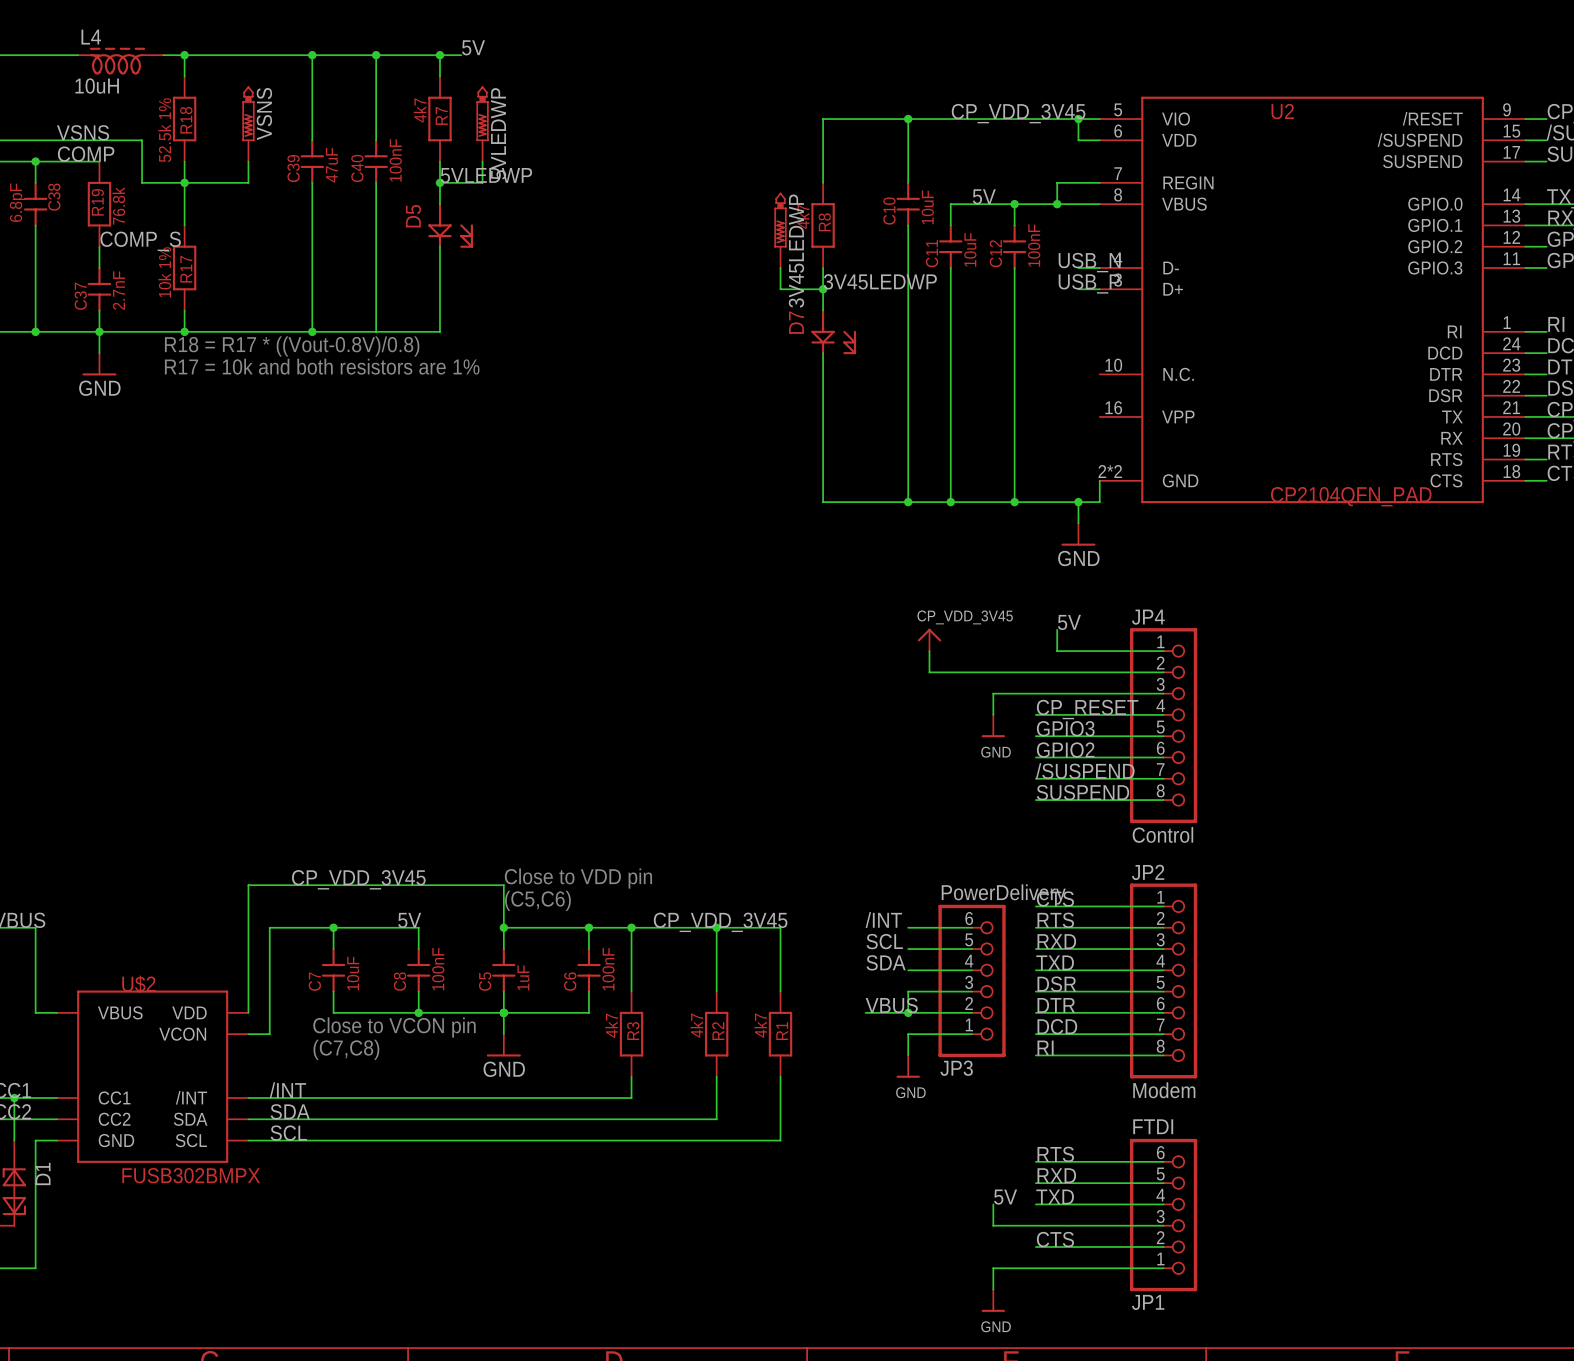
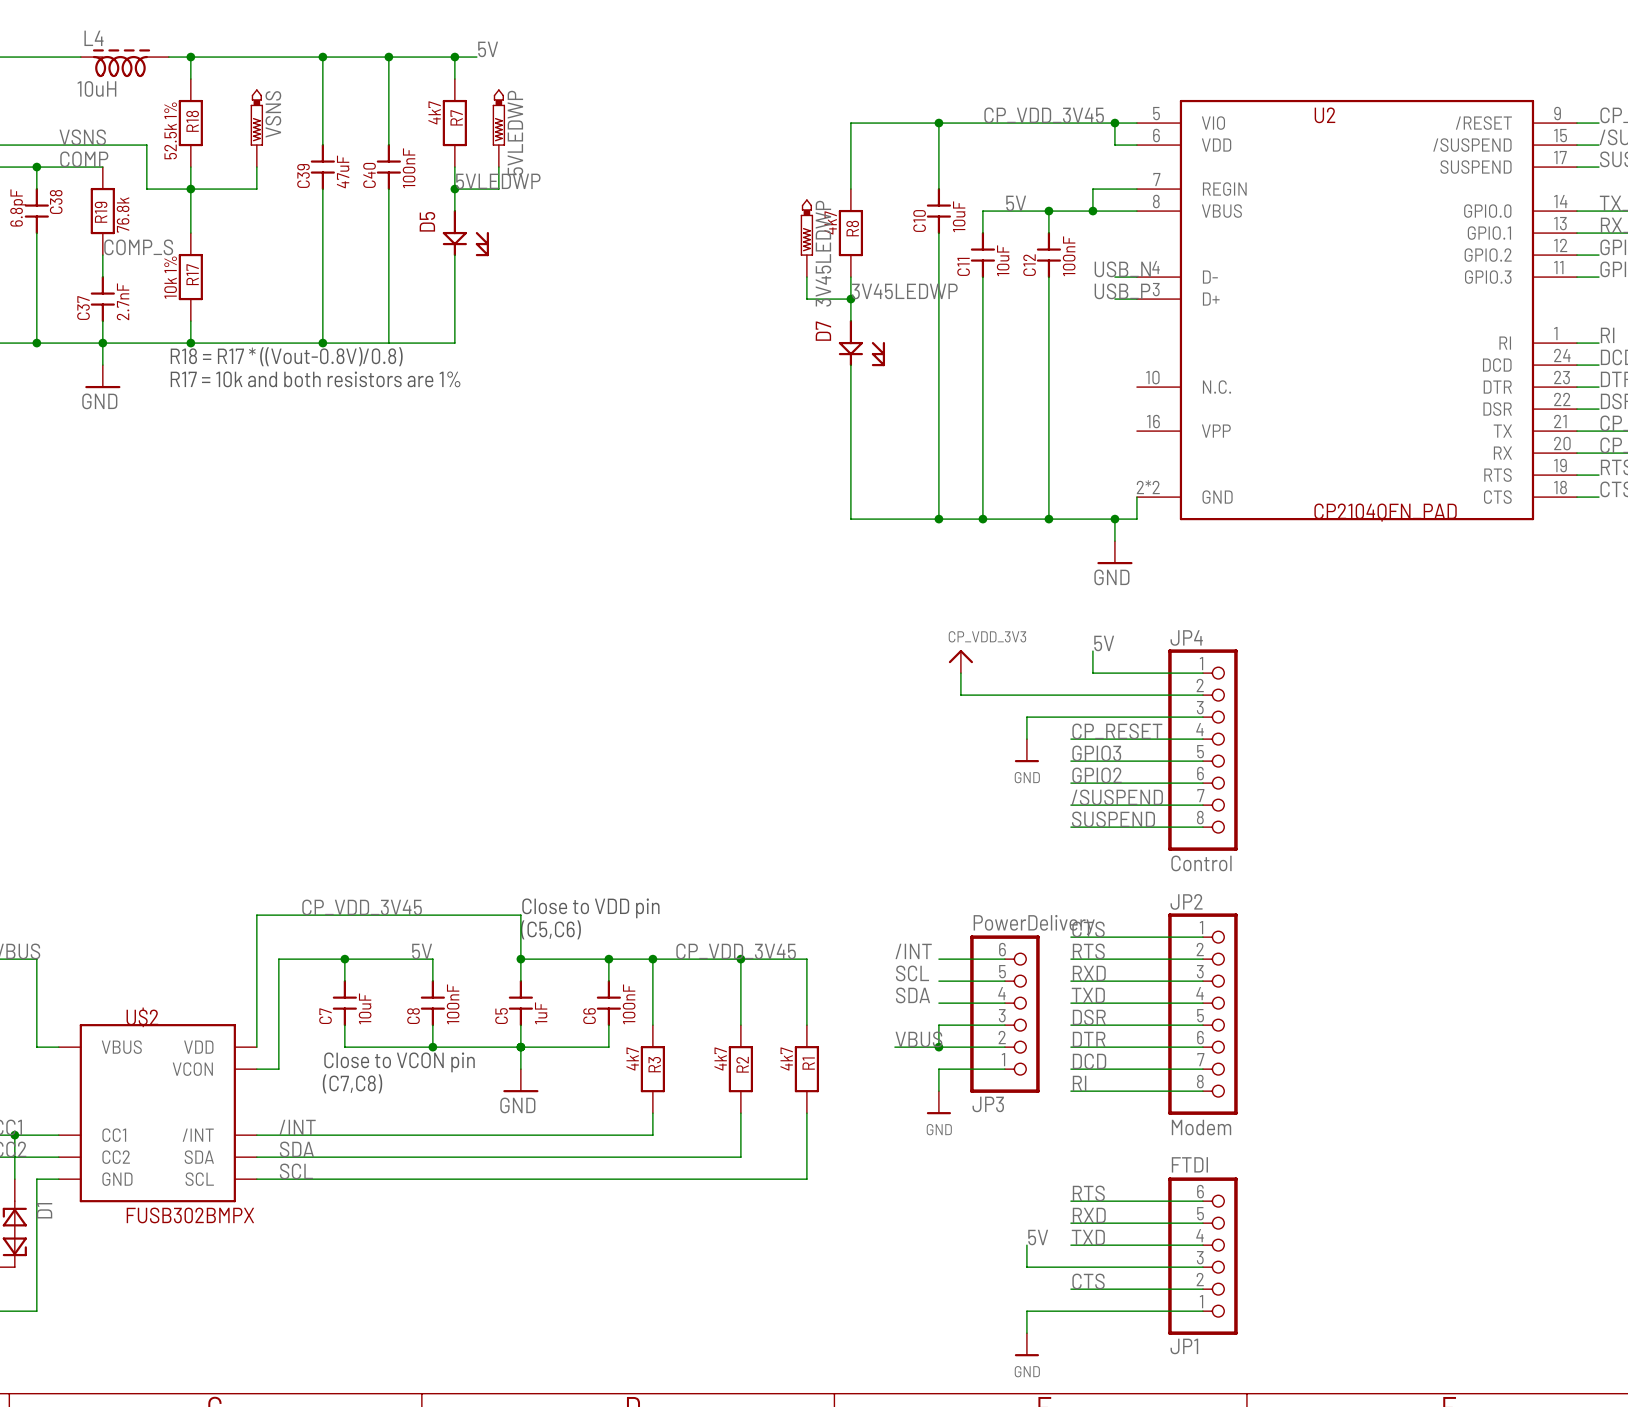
power symbol: CP_VDD_3V45 (929, 639) -> CP_VDD_3V3 (960, 661)

